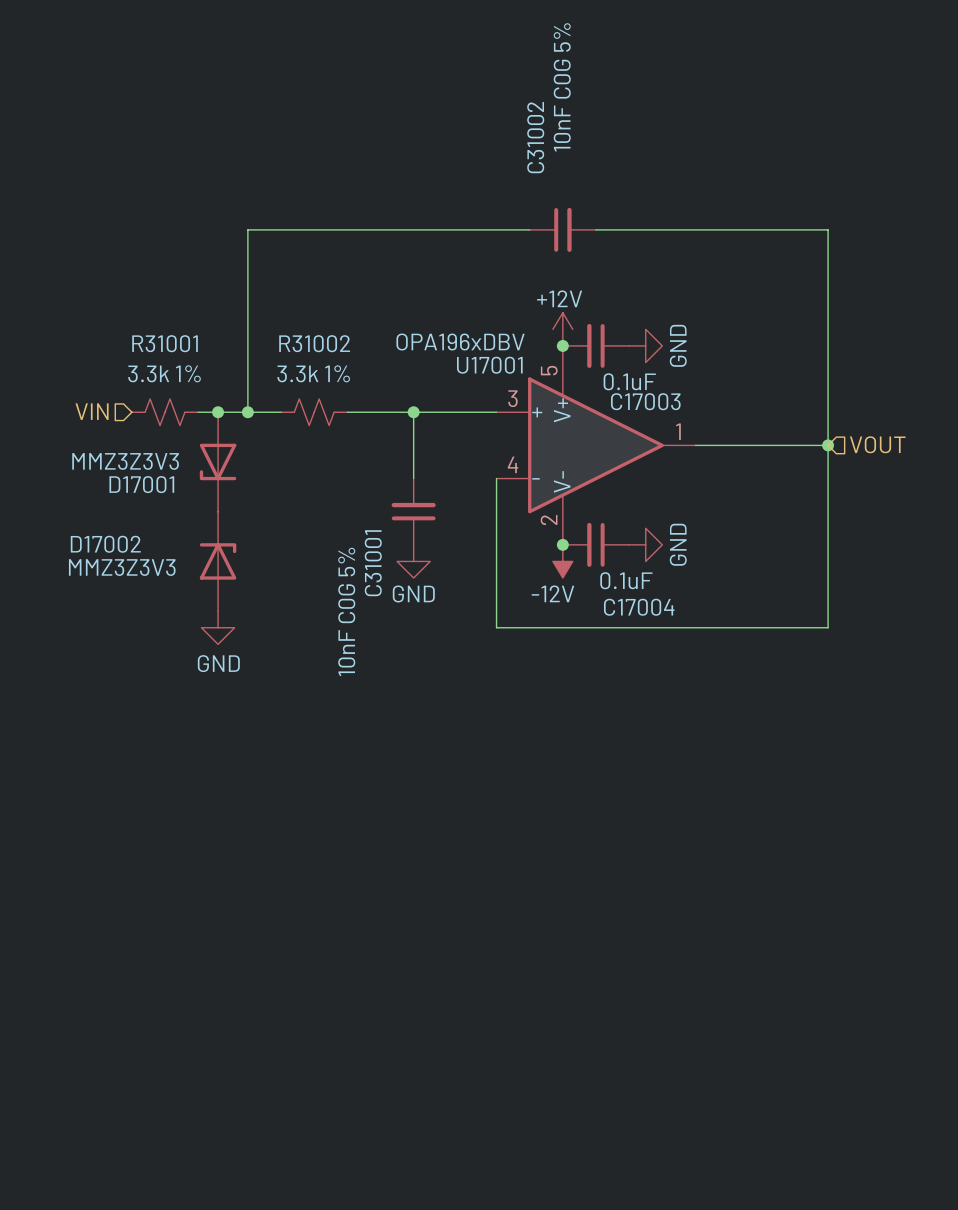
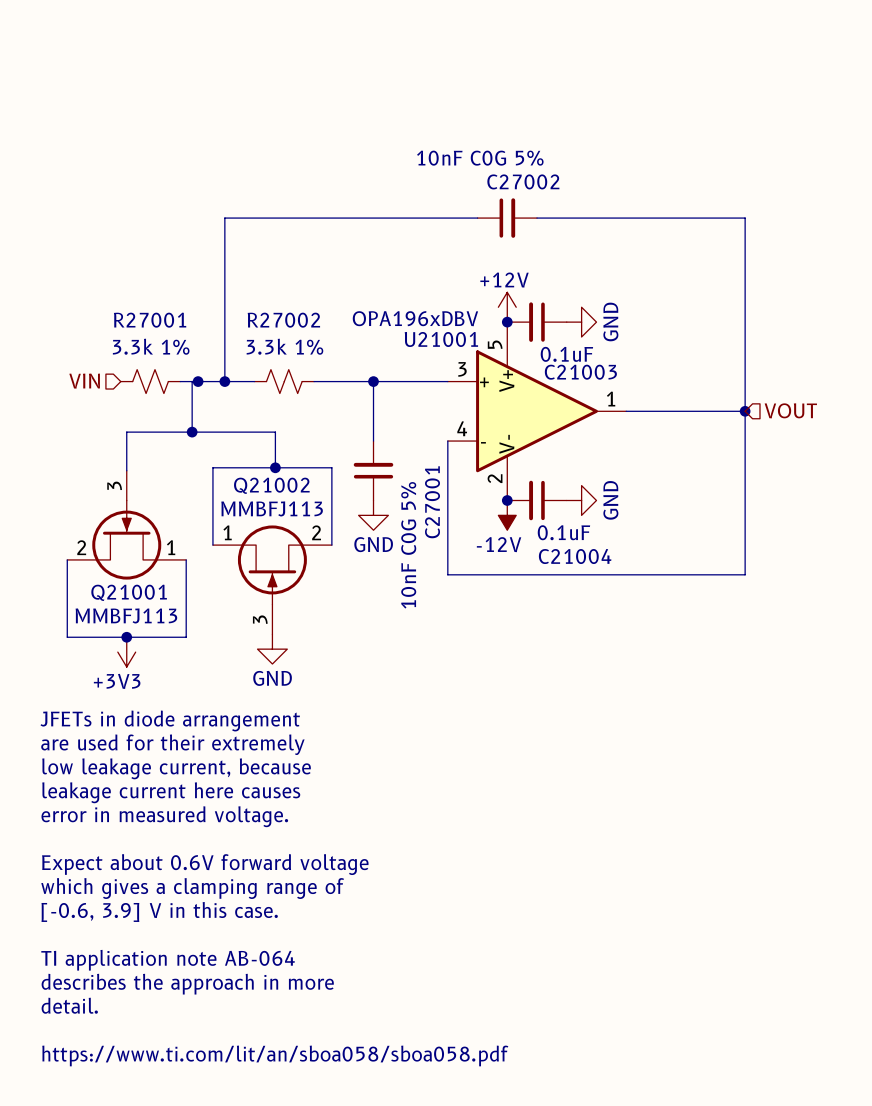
C31002 value rotation: 0° (562, 87) -> 90° clockwise (480, 158)
C31002 name: C31002 (535, 137) -> C27002 (523, 181)
R31001 name: R31001 (165, 343) -> R27001 (150, 320)
R31002 name: R31002 (314, 343) -> R27002 (283, 320)
U17001 name: U17001 (489, 365) -> U21001 (441, 339)
C17003 name: C17003 (645, 401) -> C21003 (580, 372)
wire: none -> (192, 381) (192, 432)
D17001: MMZ3Z3V3 (218, 461) -> none
junction: none -> (192, 432)
wire: none -> (275, 467) (275, 432) (126, 432) (126, 470)
junction: none -> (275, 467)
D17002: MMZ3Z3V3 (218, 561) -> none
C31001 name: C31001 (373, 563) -> C27001 (432, 502)
Q21001: none -> MMBFJ113 (126, 525)
wire: none -> (212, 545) (212, 467) (331, 467) (331, 545)
C17004 name: C17004 (639, 607) -> C21004 (575, 556)
wire: none -> (67, 559) (67, 637) (186, 637) (186, 559)
C31001 value position: 10nF C0G 5% (346, 611) -> 10nF C0G 5% (408, 545)
power symbol position: GND (218, 627) -> GND (272, 649)
Q21002: none -> MMBFJ113 (272, 579)
power symbol text position: GND (218, 663) -> GND (272, 678)
junction: none -> (126, 637)
power symbol: none -> +3V3 (126, 652)
text: none -> JFETs in diode arrangement (170, 720)
text: none -> are used for their extremely (172, 744)
text: none -> low leakage current, because (176, 768)
text: none -> leakage current here causes (171, 792)
text: none -> error in measured voltage. (164, 816)
text: none -> Expect about 0.6V forward voltage (205, 864)
text: none -> which gives a clamping range of (192, 888)
text: none -> [-0.6, 3.9] V in this case. (159, 911)
text: none -> TI application note AB-064 (168, 960)
text: none -> describes the approach in more (187, 984)
text: none -> detail. (69, 1005)
text: none -> https://www.ti.com/lit/an/sboa058/sboa058.pdf (275, 1055)

